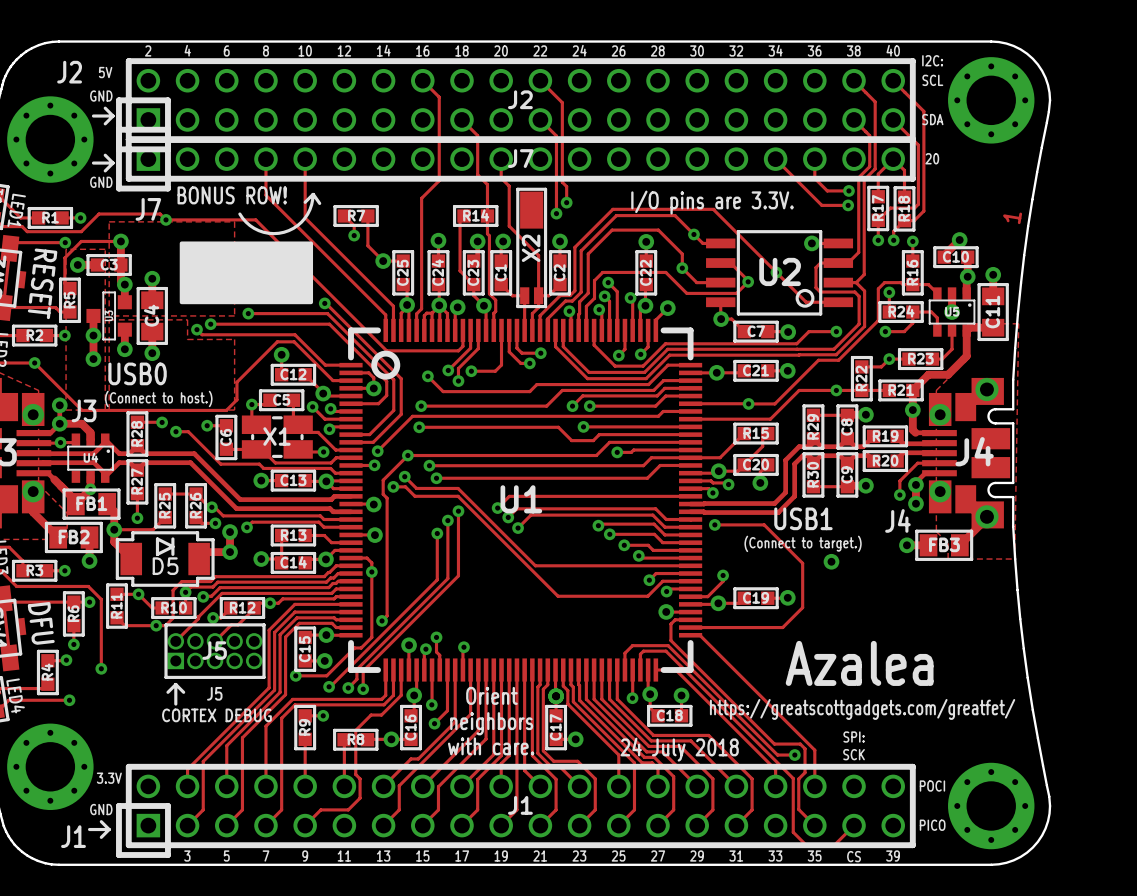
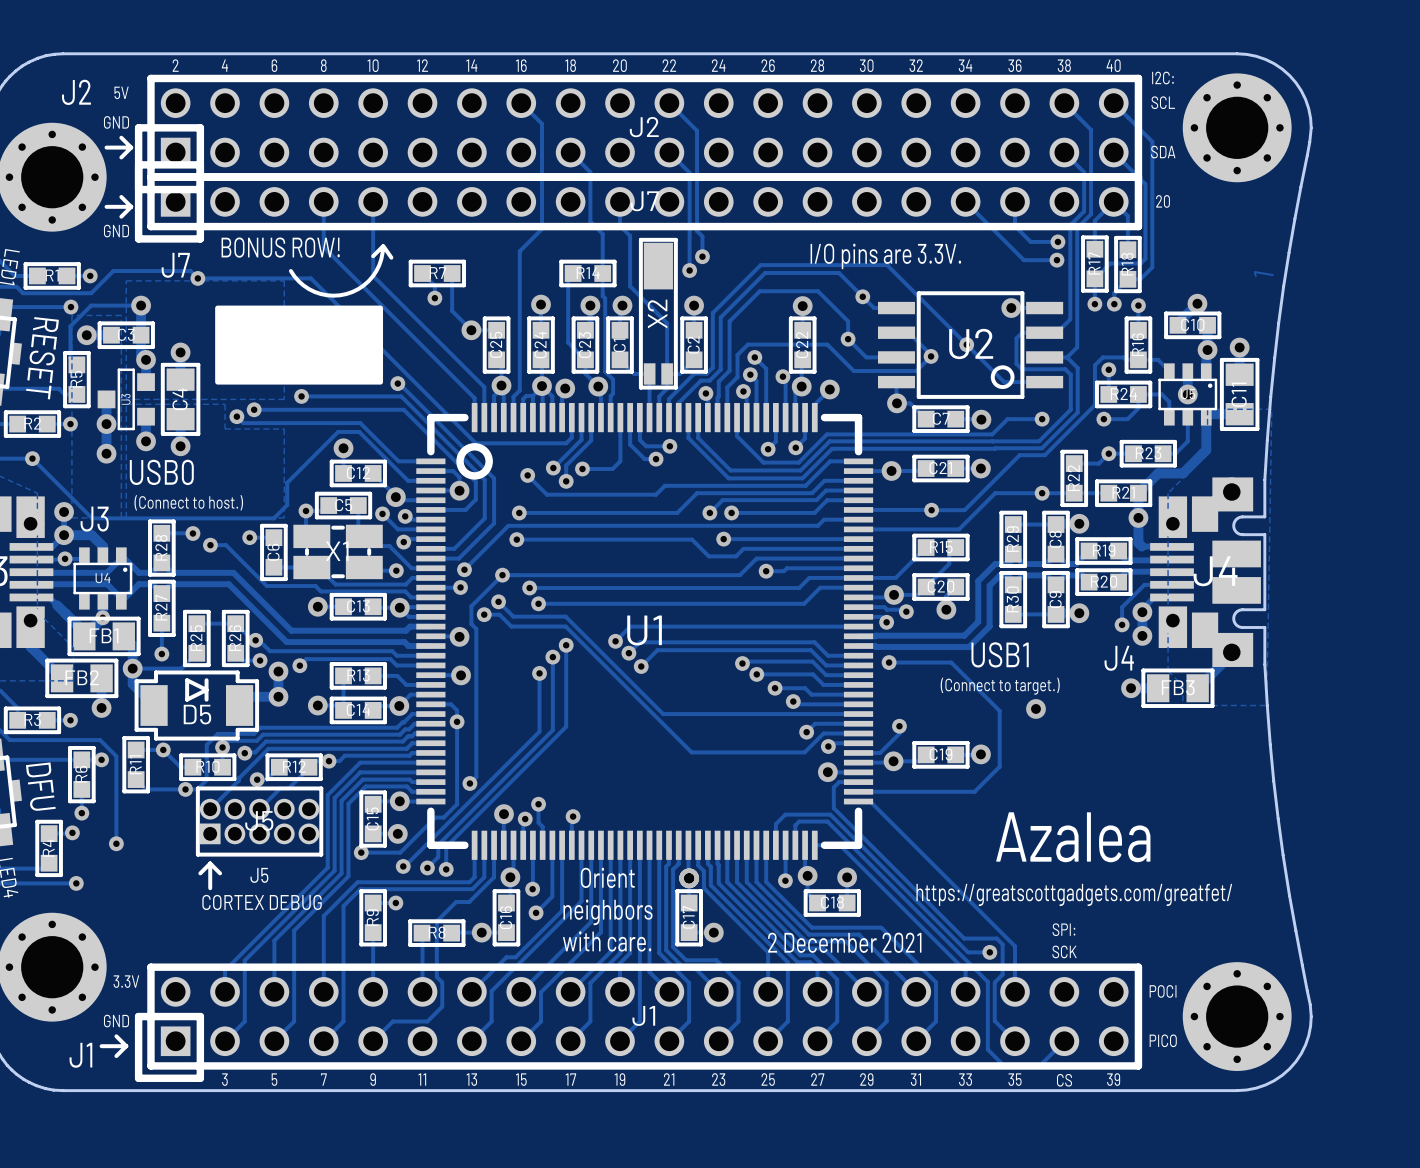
text: 24 July 2018 (679, 749) -> 2 December 2021 (844, 942)

